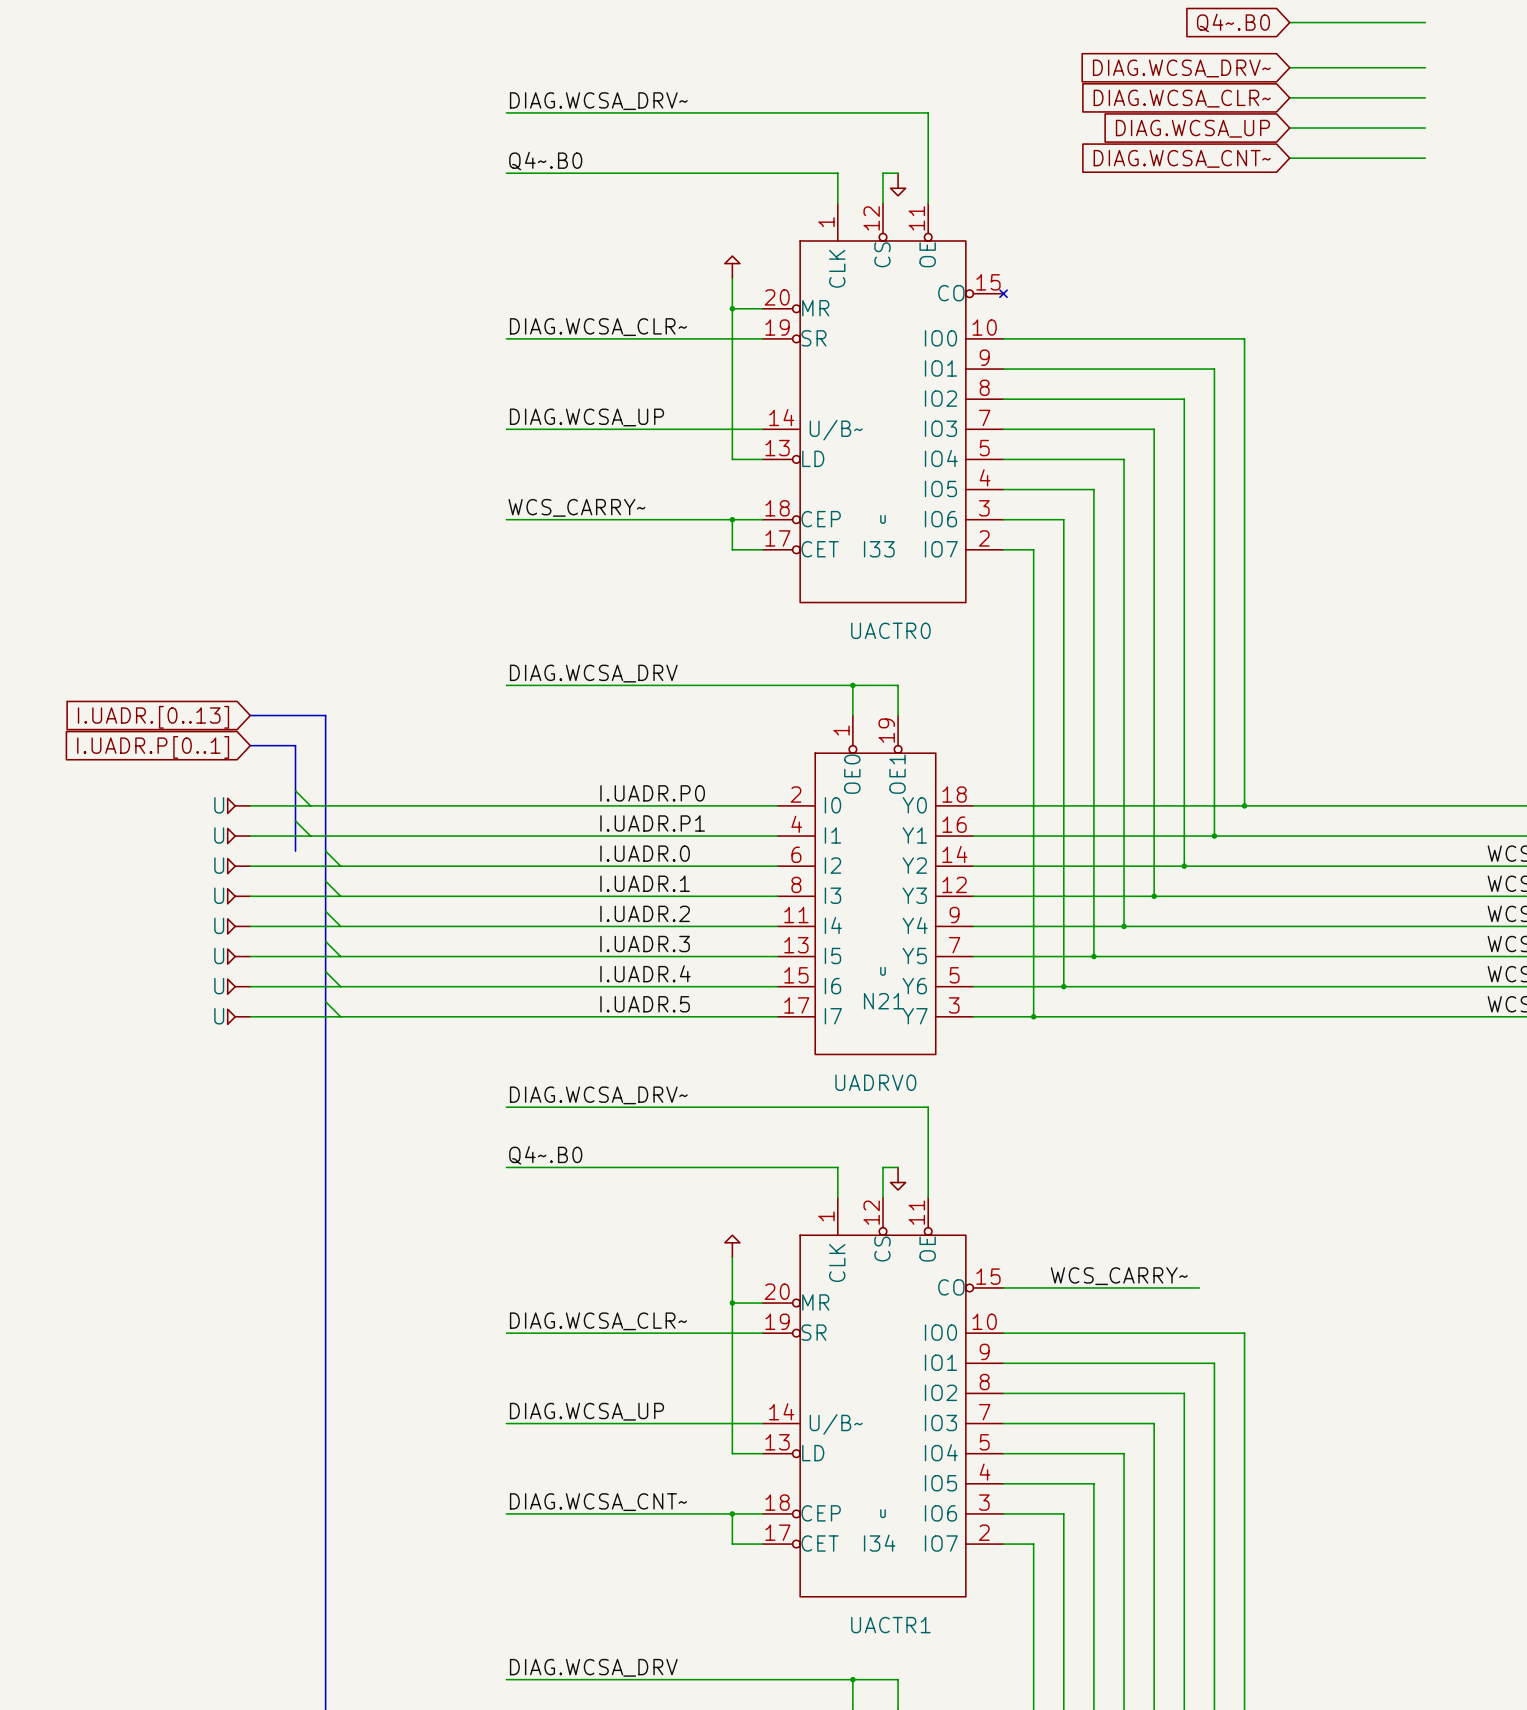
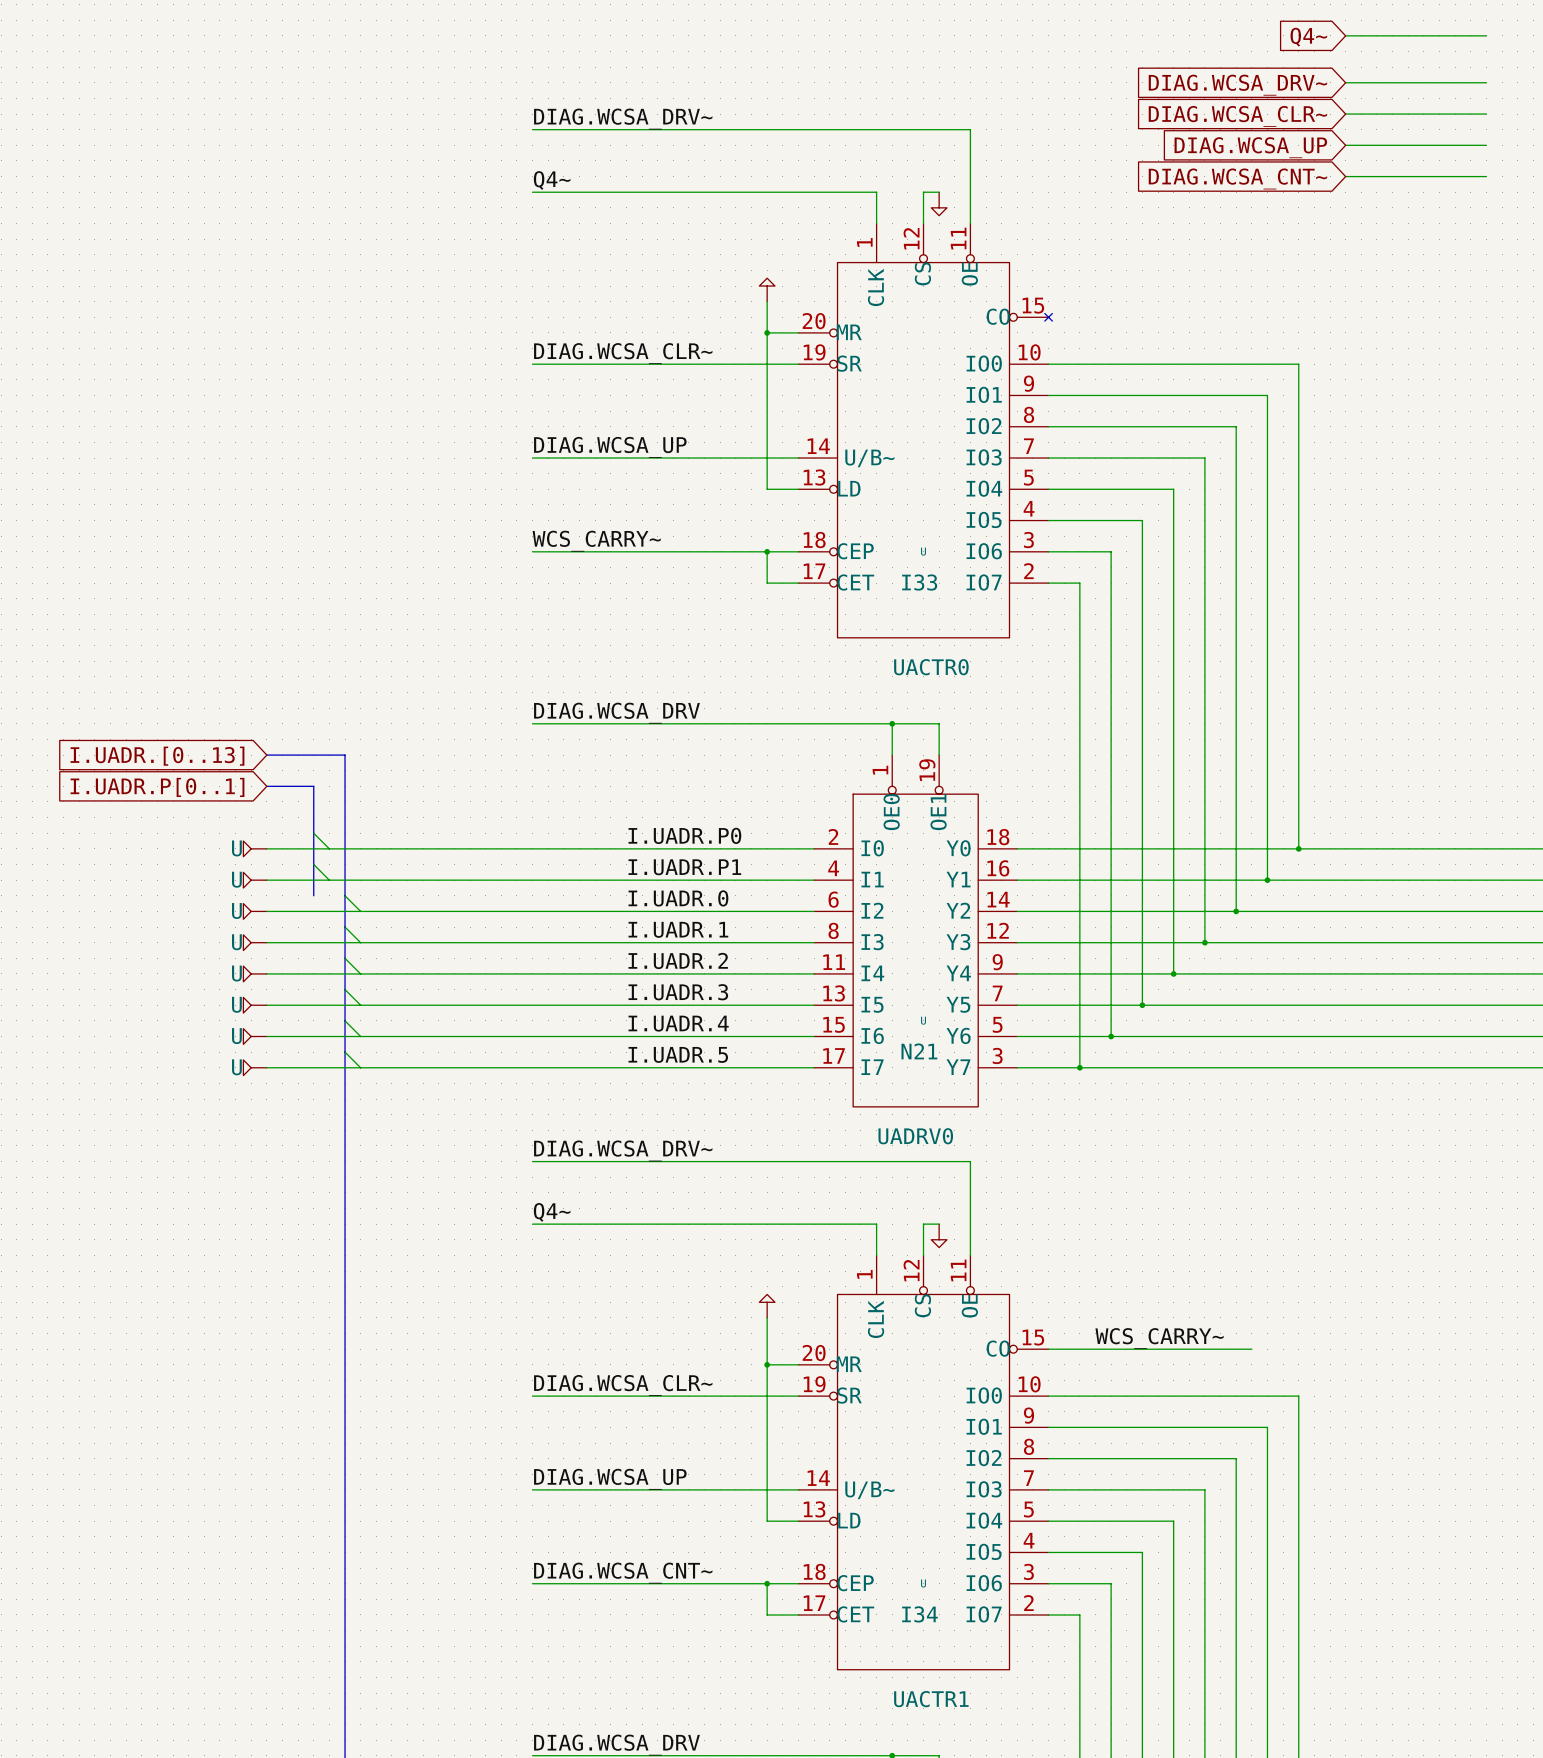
global label: Q4~.B0 (1233, 22) -> Q4~ (1308, 37)
label: Q4~.B0 (545, 161) -> Q4~ (552, 180)
label: Q4~.B0 (545, 1155) -> Q4~ (552, 1212)

